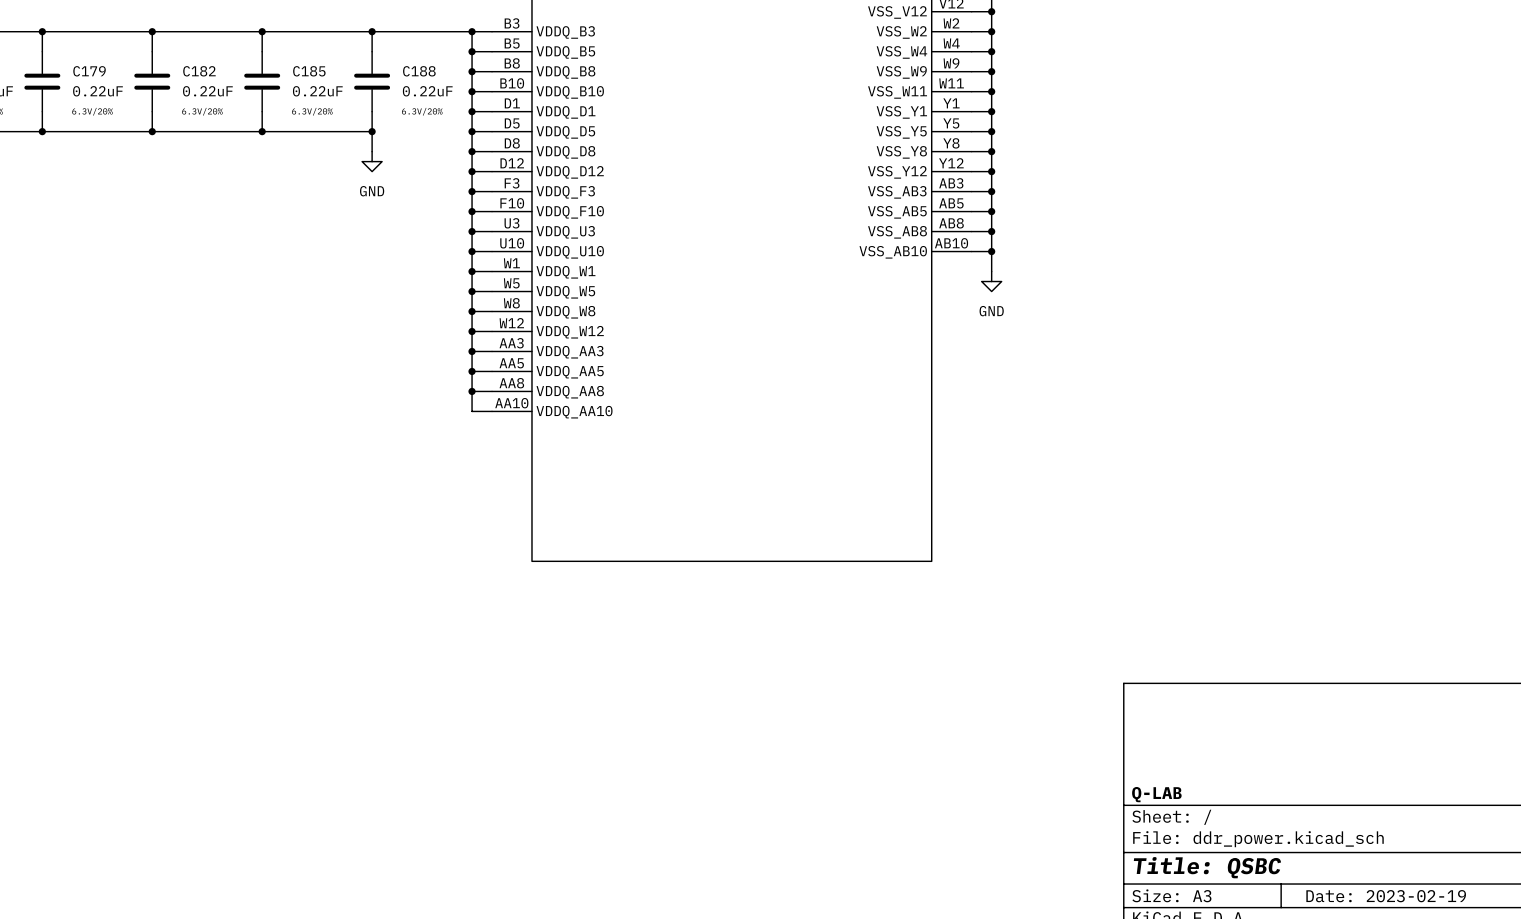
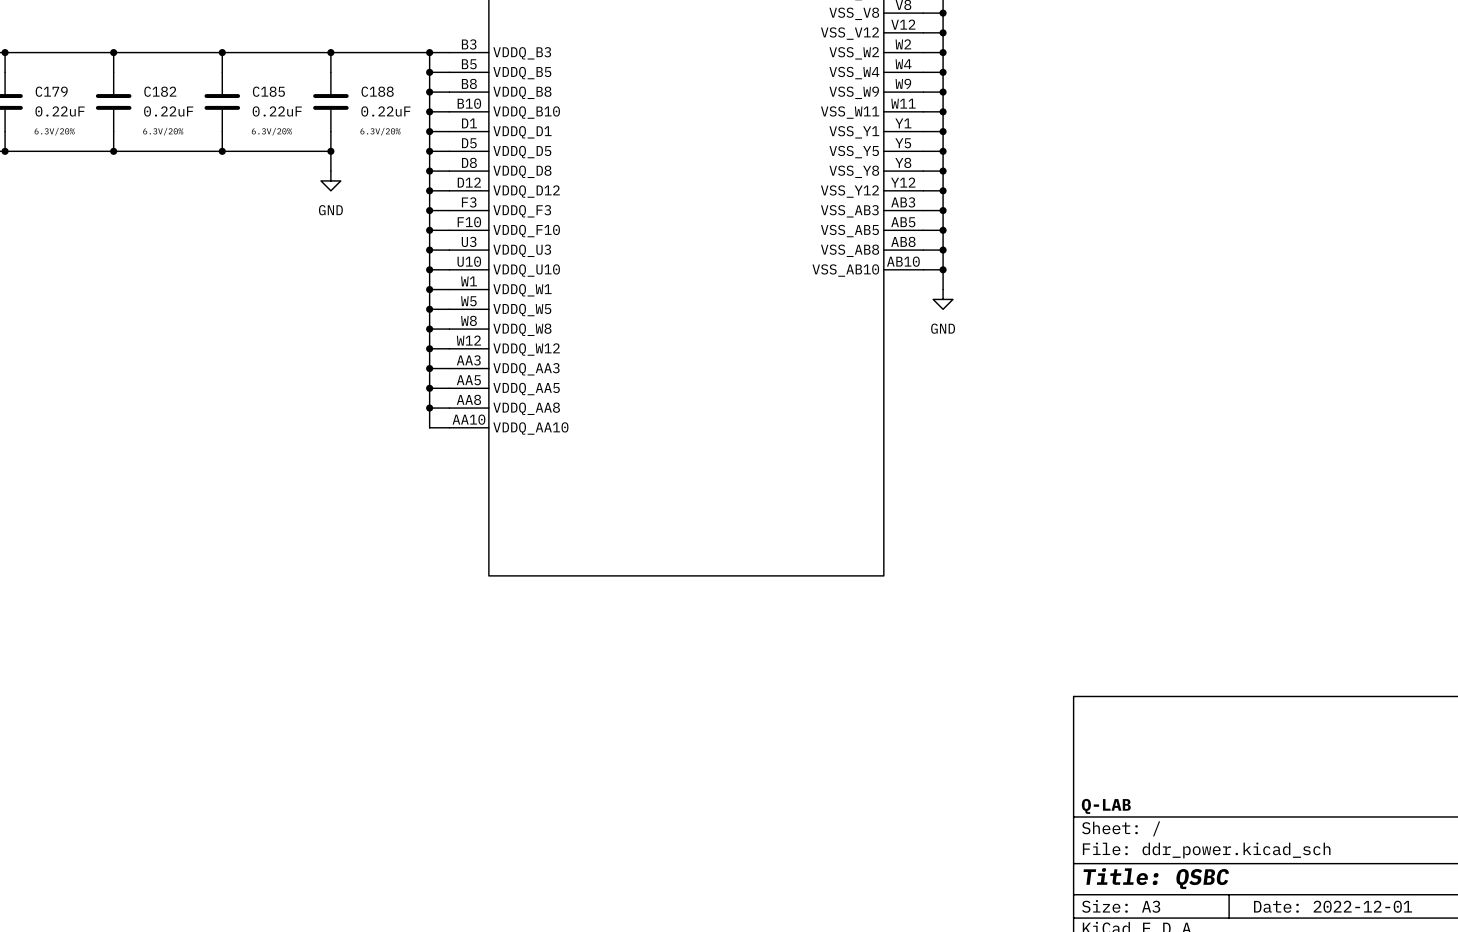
title block: Date: 2023-02-19 (1386, 896) -> Date: 2022-12-01 (1333, 906)

